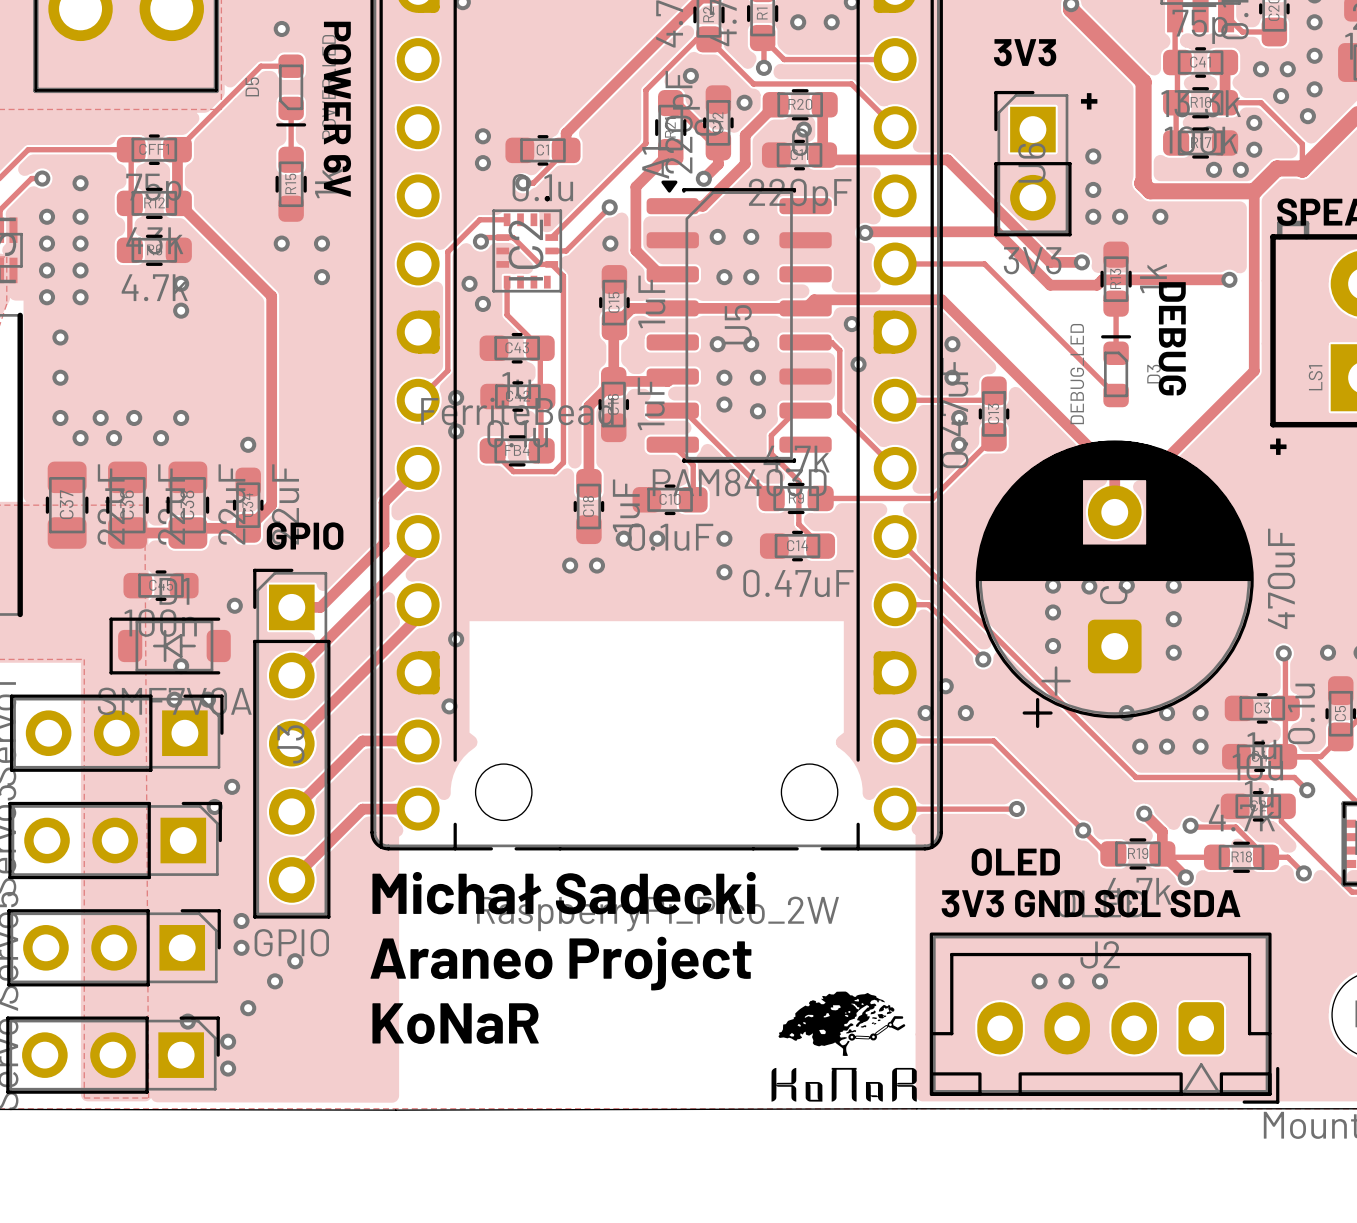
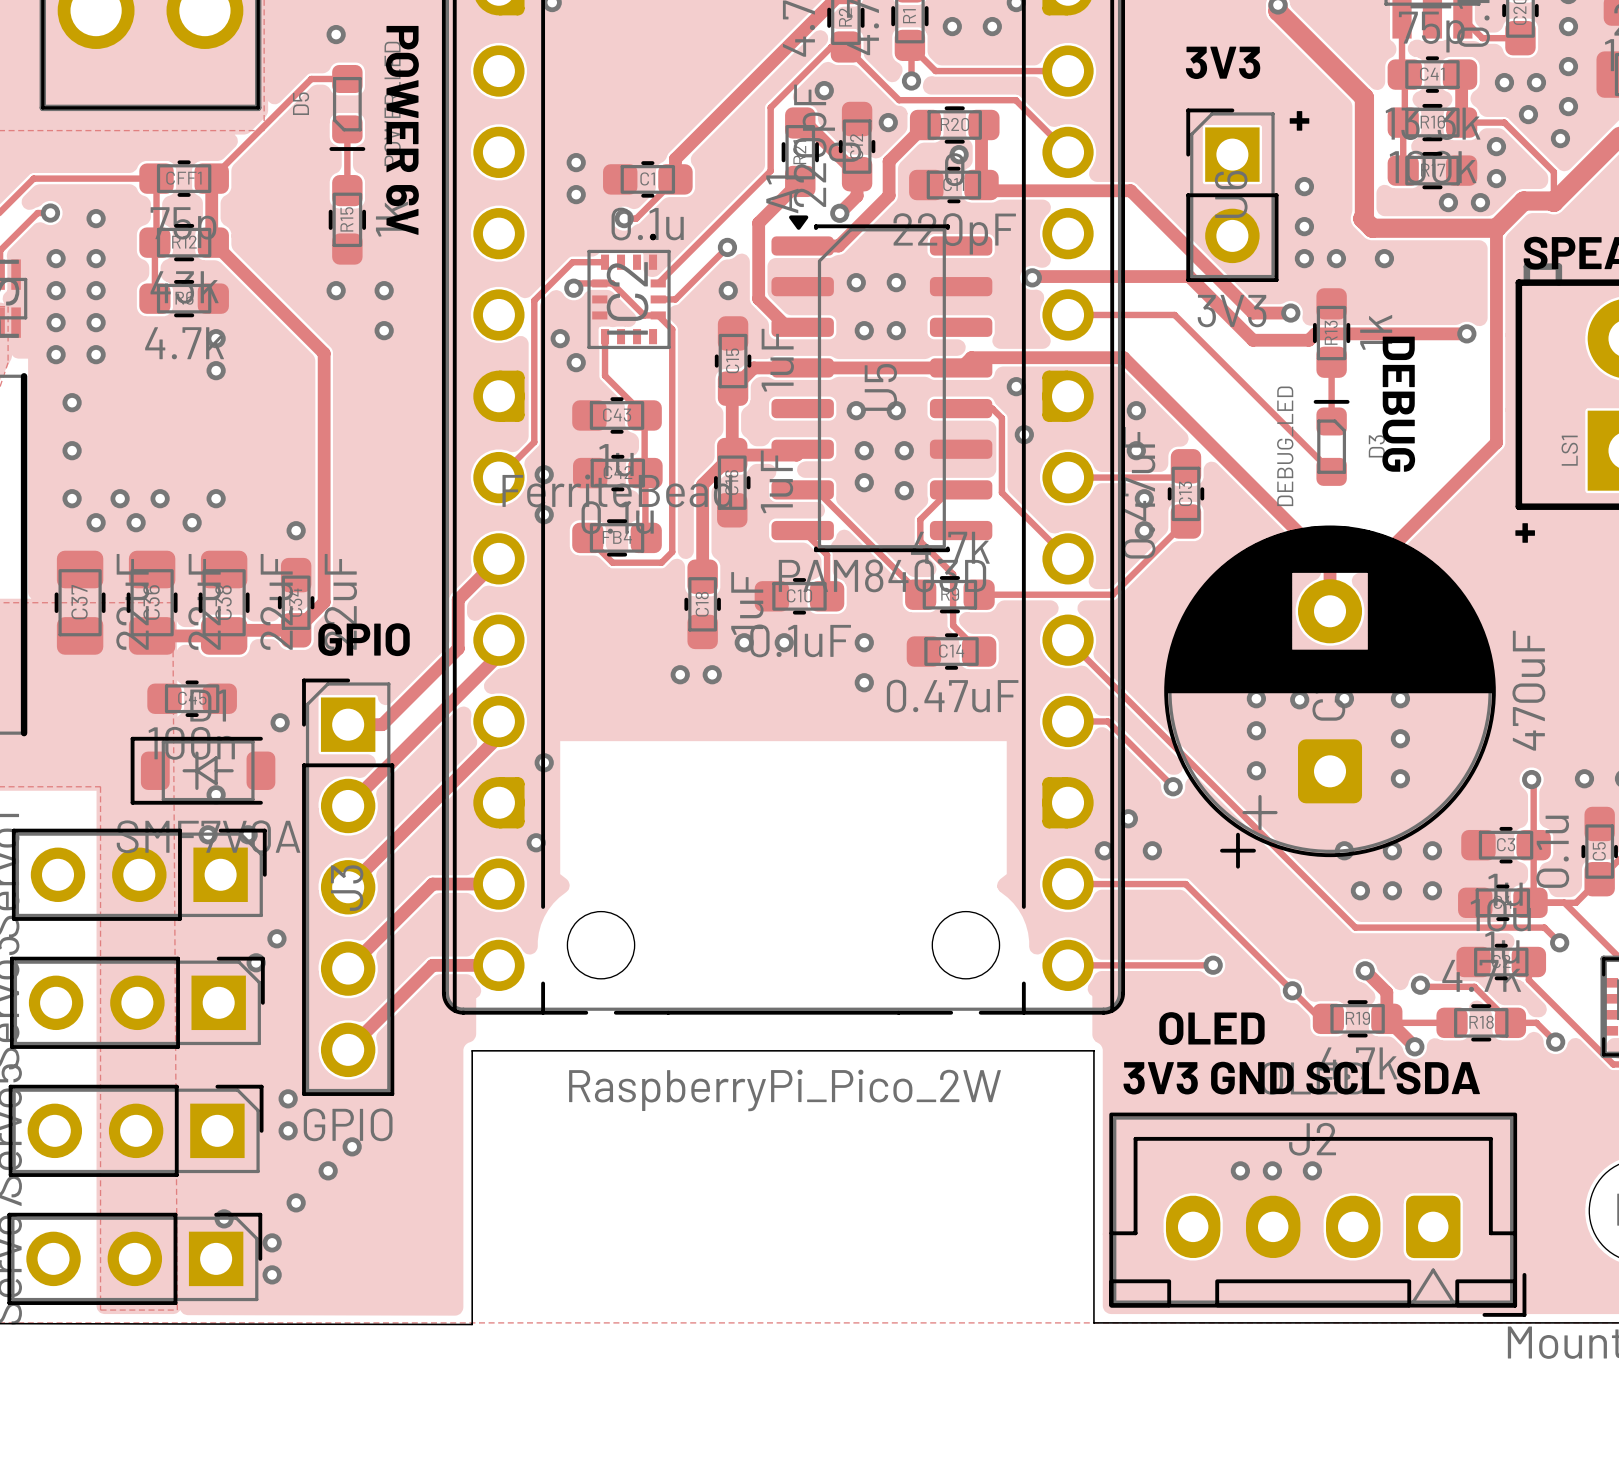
text: Michał Sadecki (564, 893) -> none
text: Araneo Project (560, 963) -> none
drawing: [771, 991, 917, 1102] -> none
text: KoNaR (455, 1023) -> none
board edge: (916, 1108) (395, 1110) -> (1093, 1322) (1093, 1050) (472, 1050) (472, 1324)

